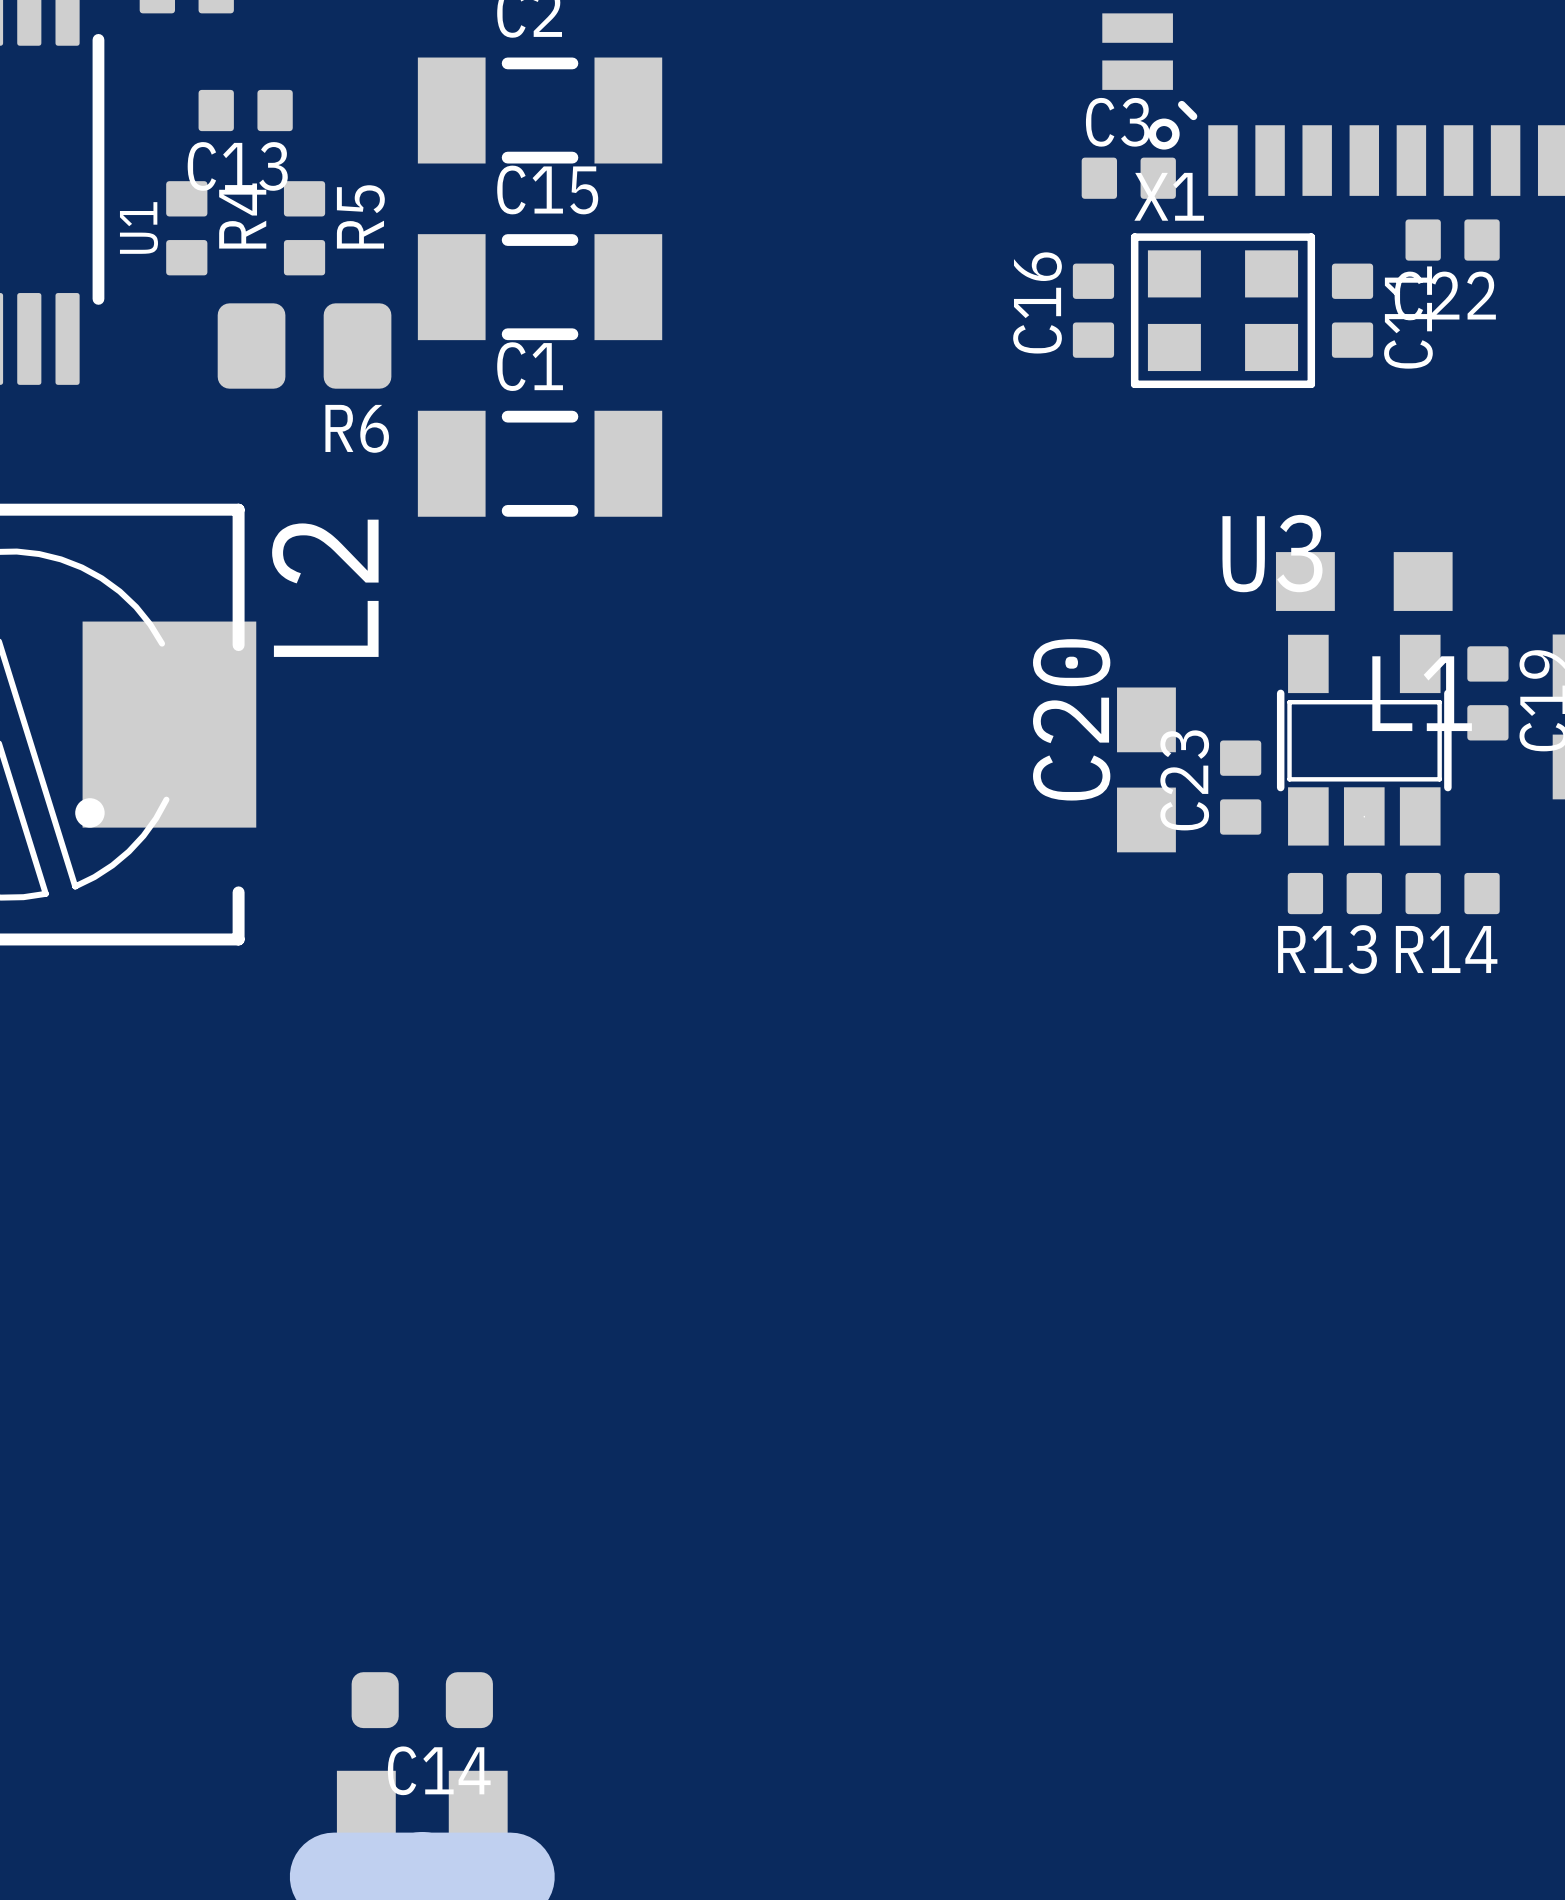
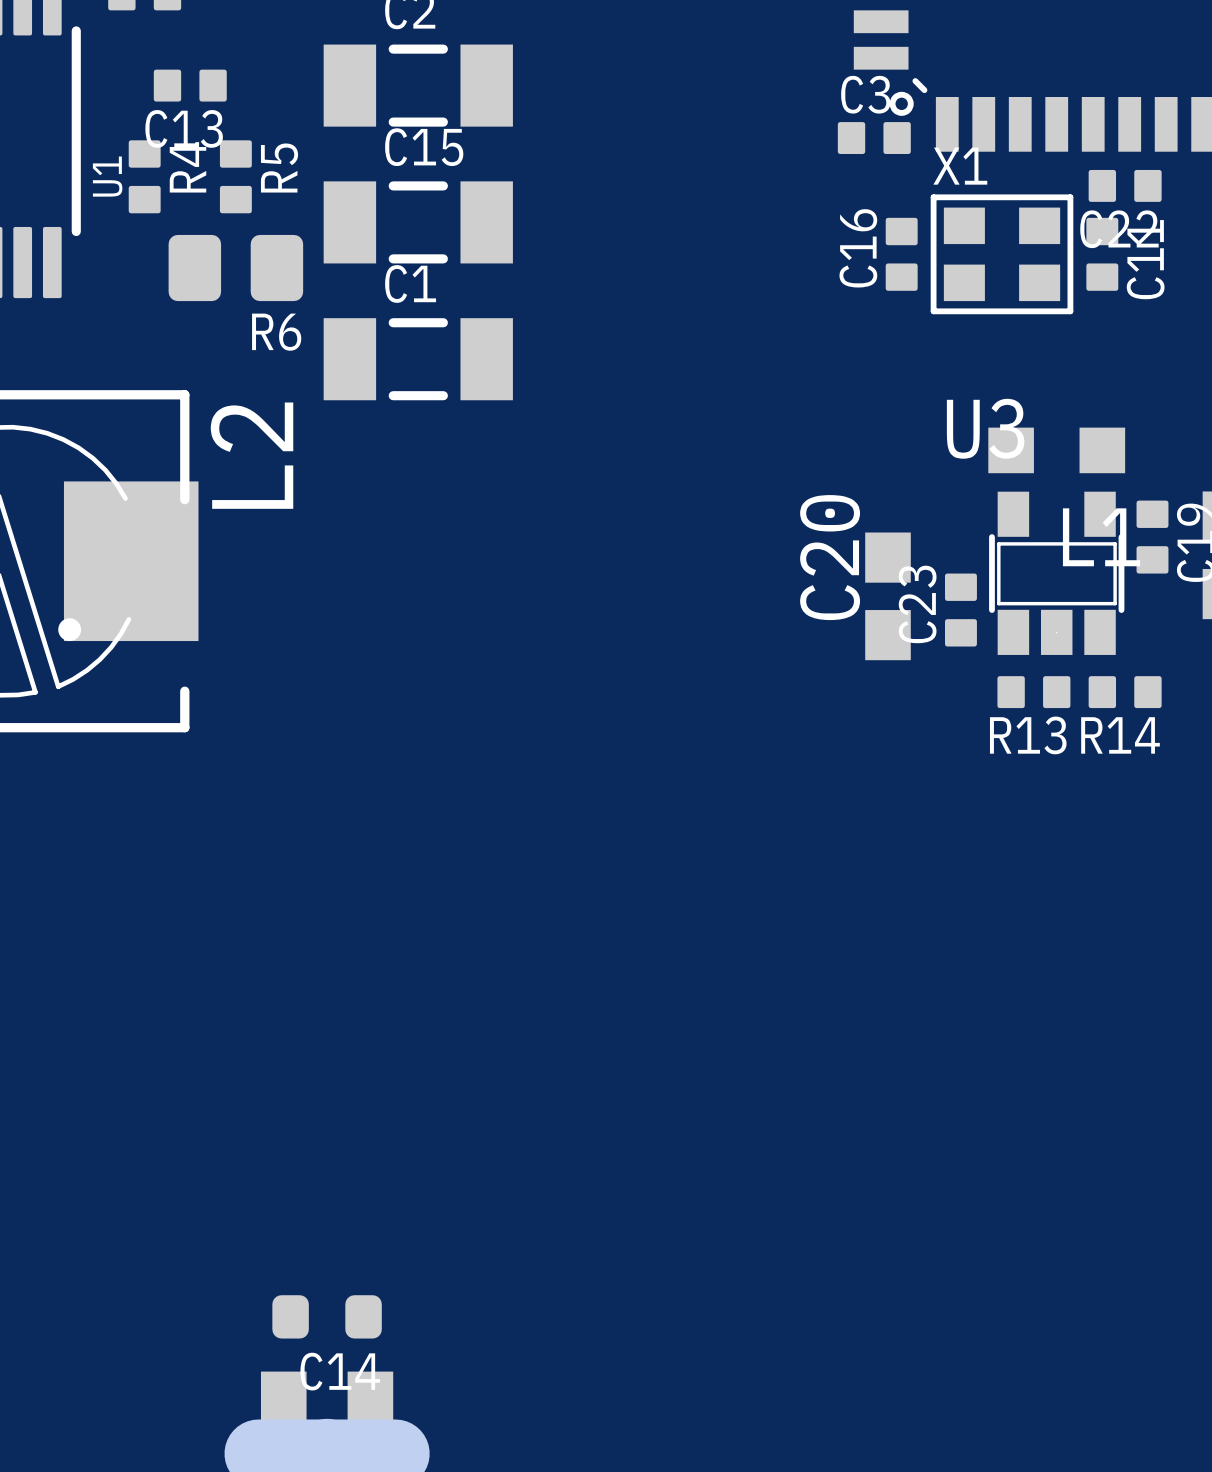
C16 position: (1093, 310) -> (901, 254)
X1 position: (1222, 310) -> (1002, 254)
C11 position: (1352, 310) -> (1102, 254)

